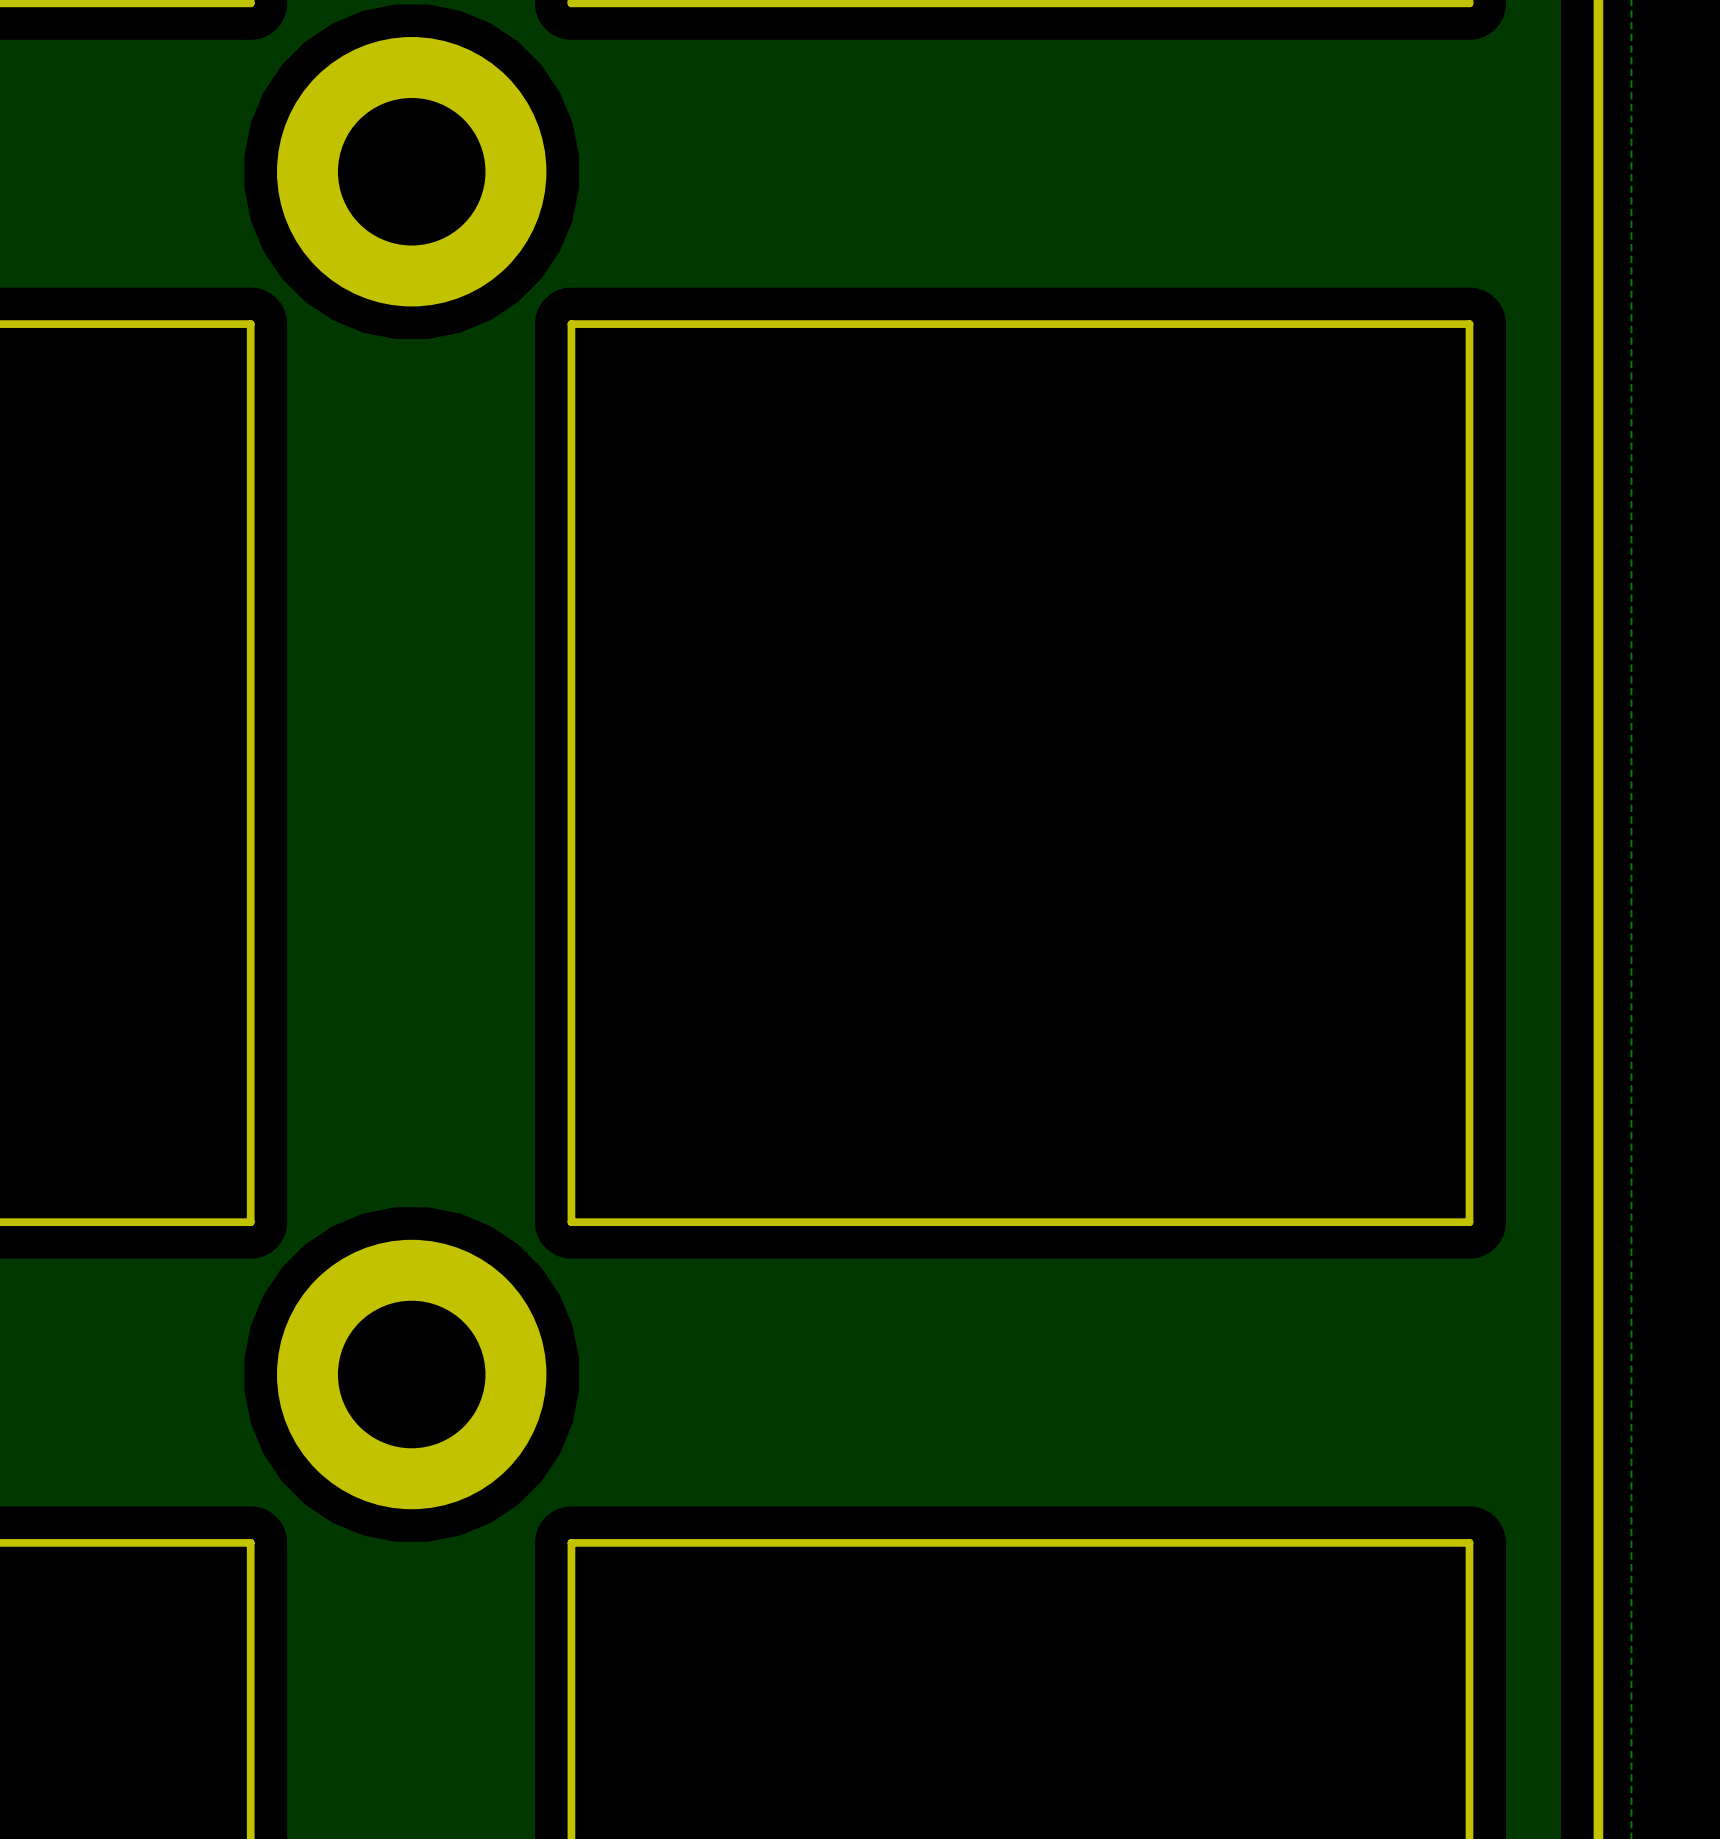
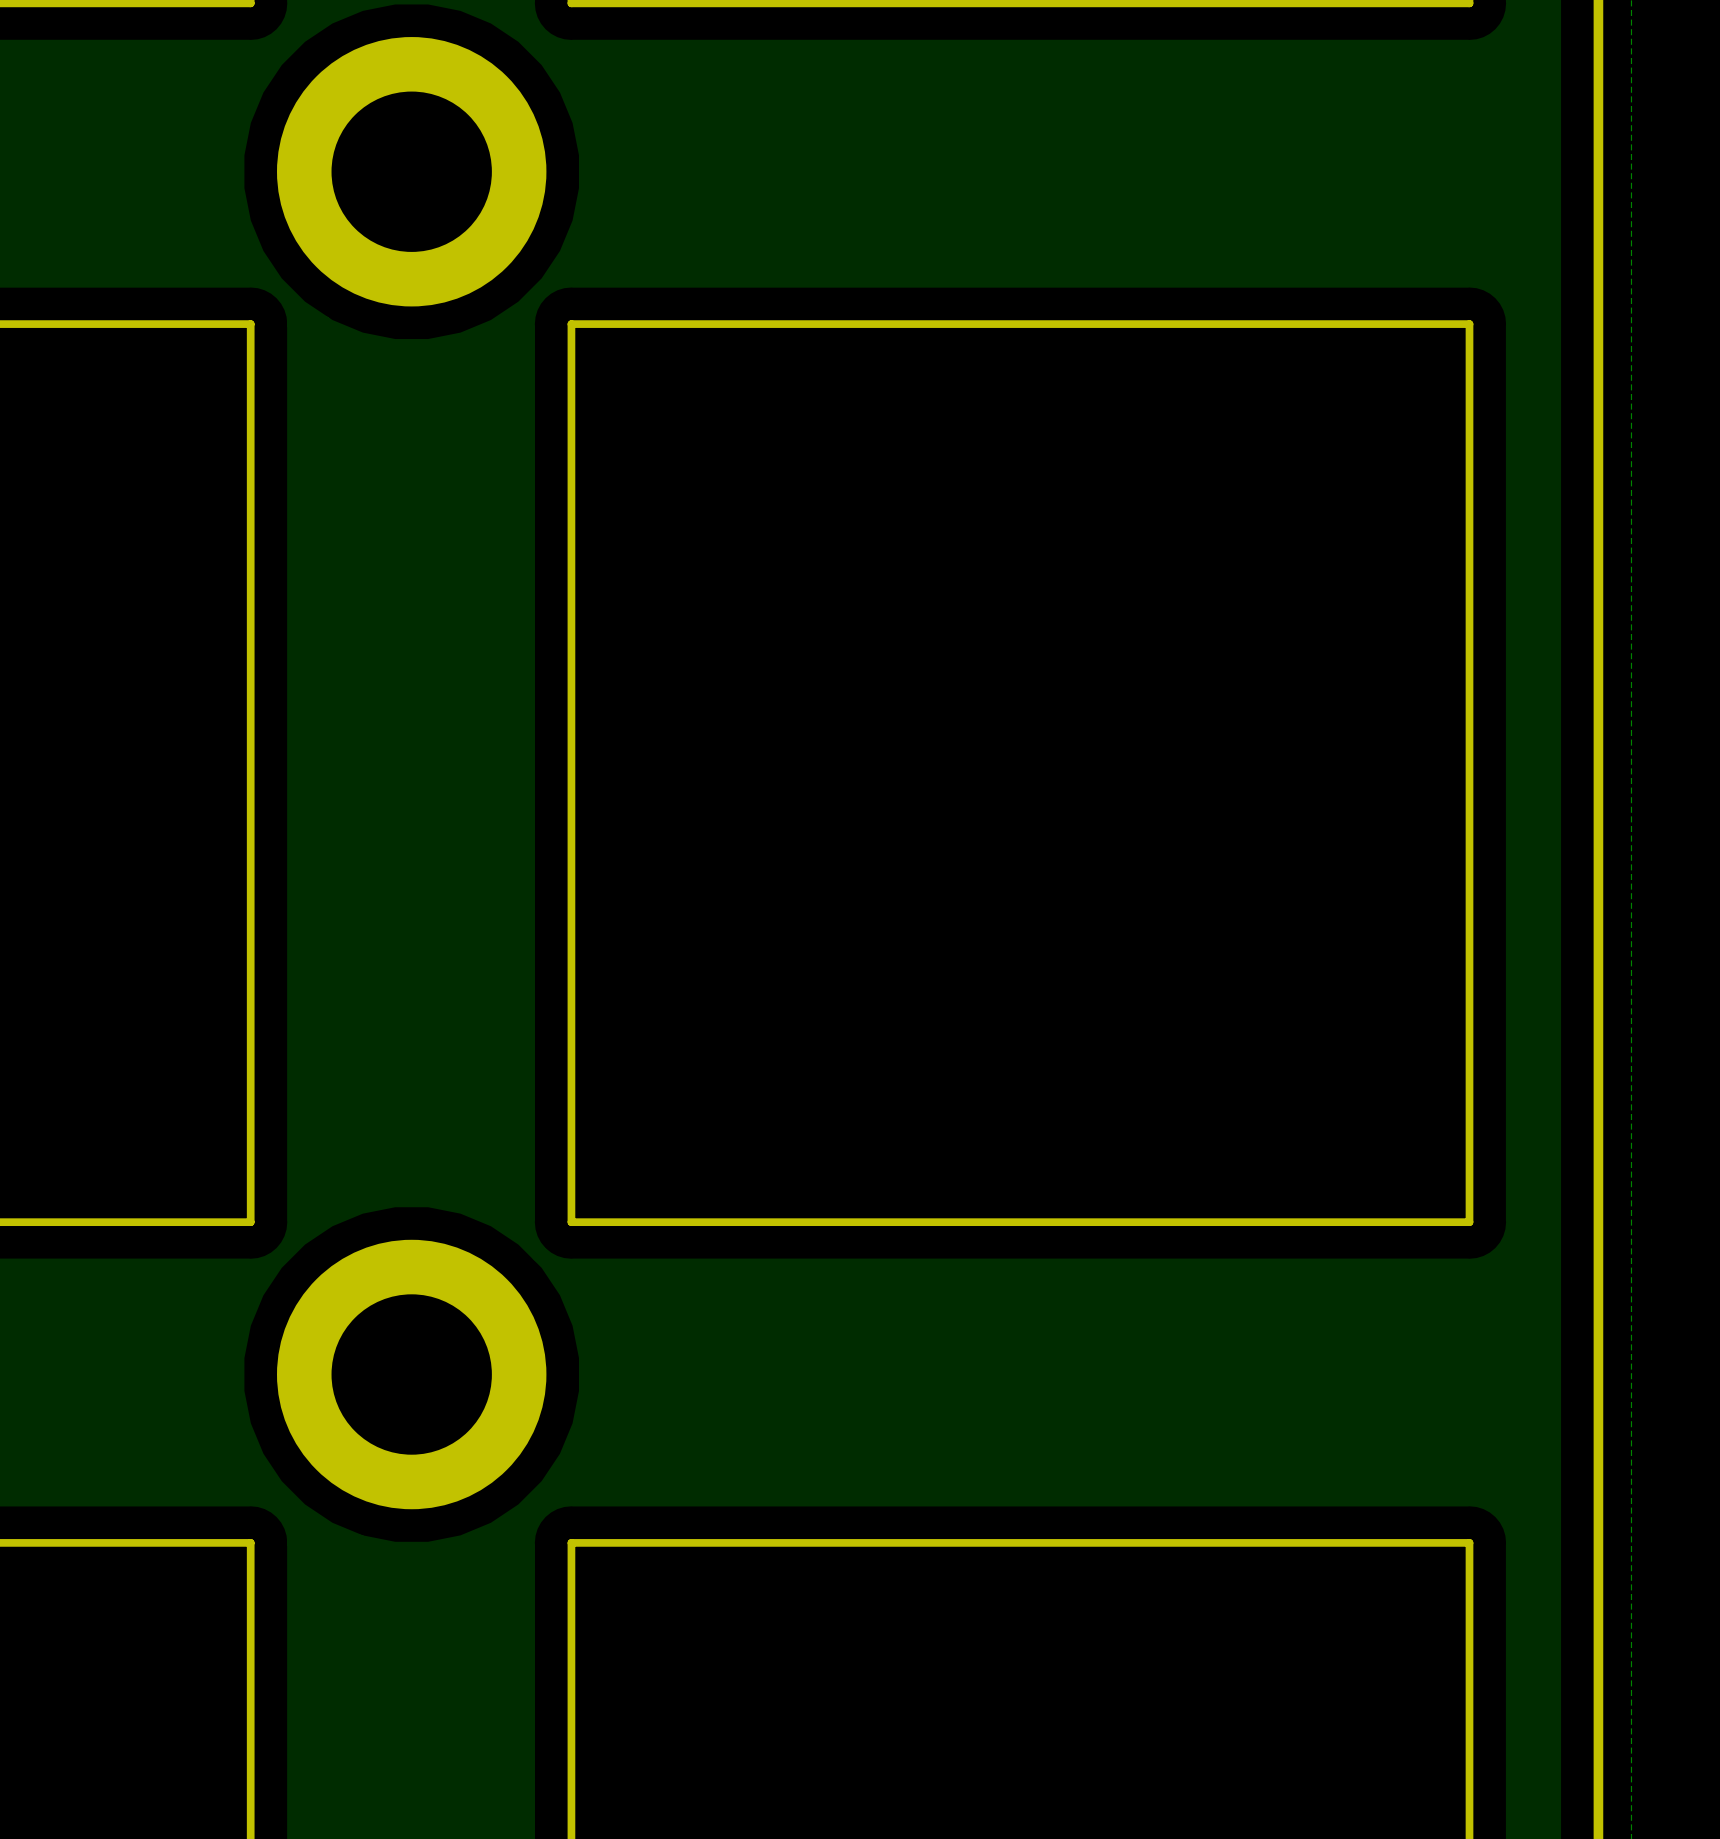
part footprint: [277, 37, 547, 307] -> [277, 37, 547, 307]
part footprint: [277, 1239, 547, 1510] -> [277, 1239, 547, 1510]

